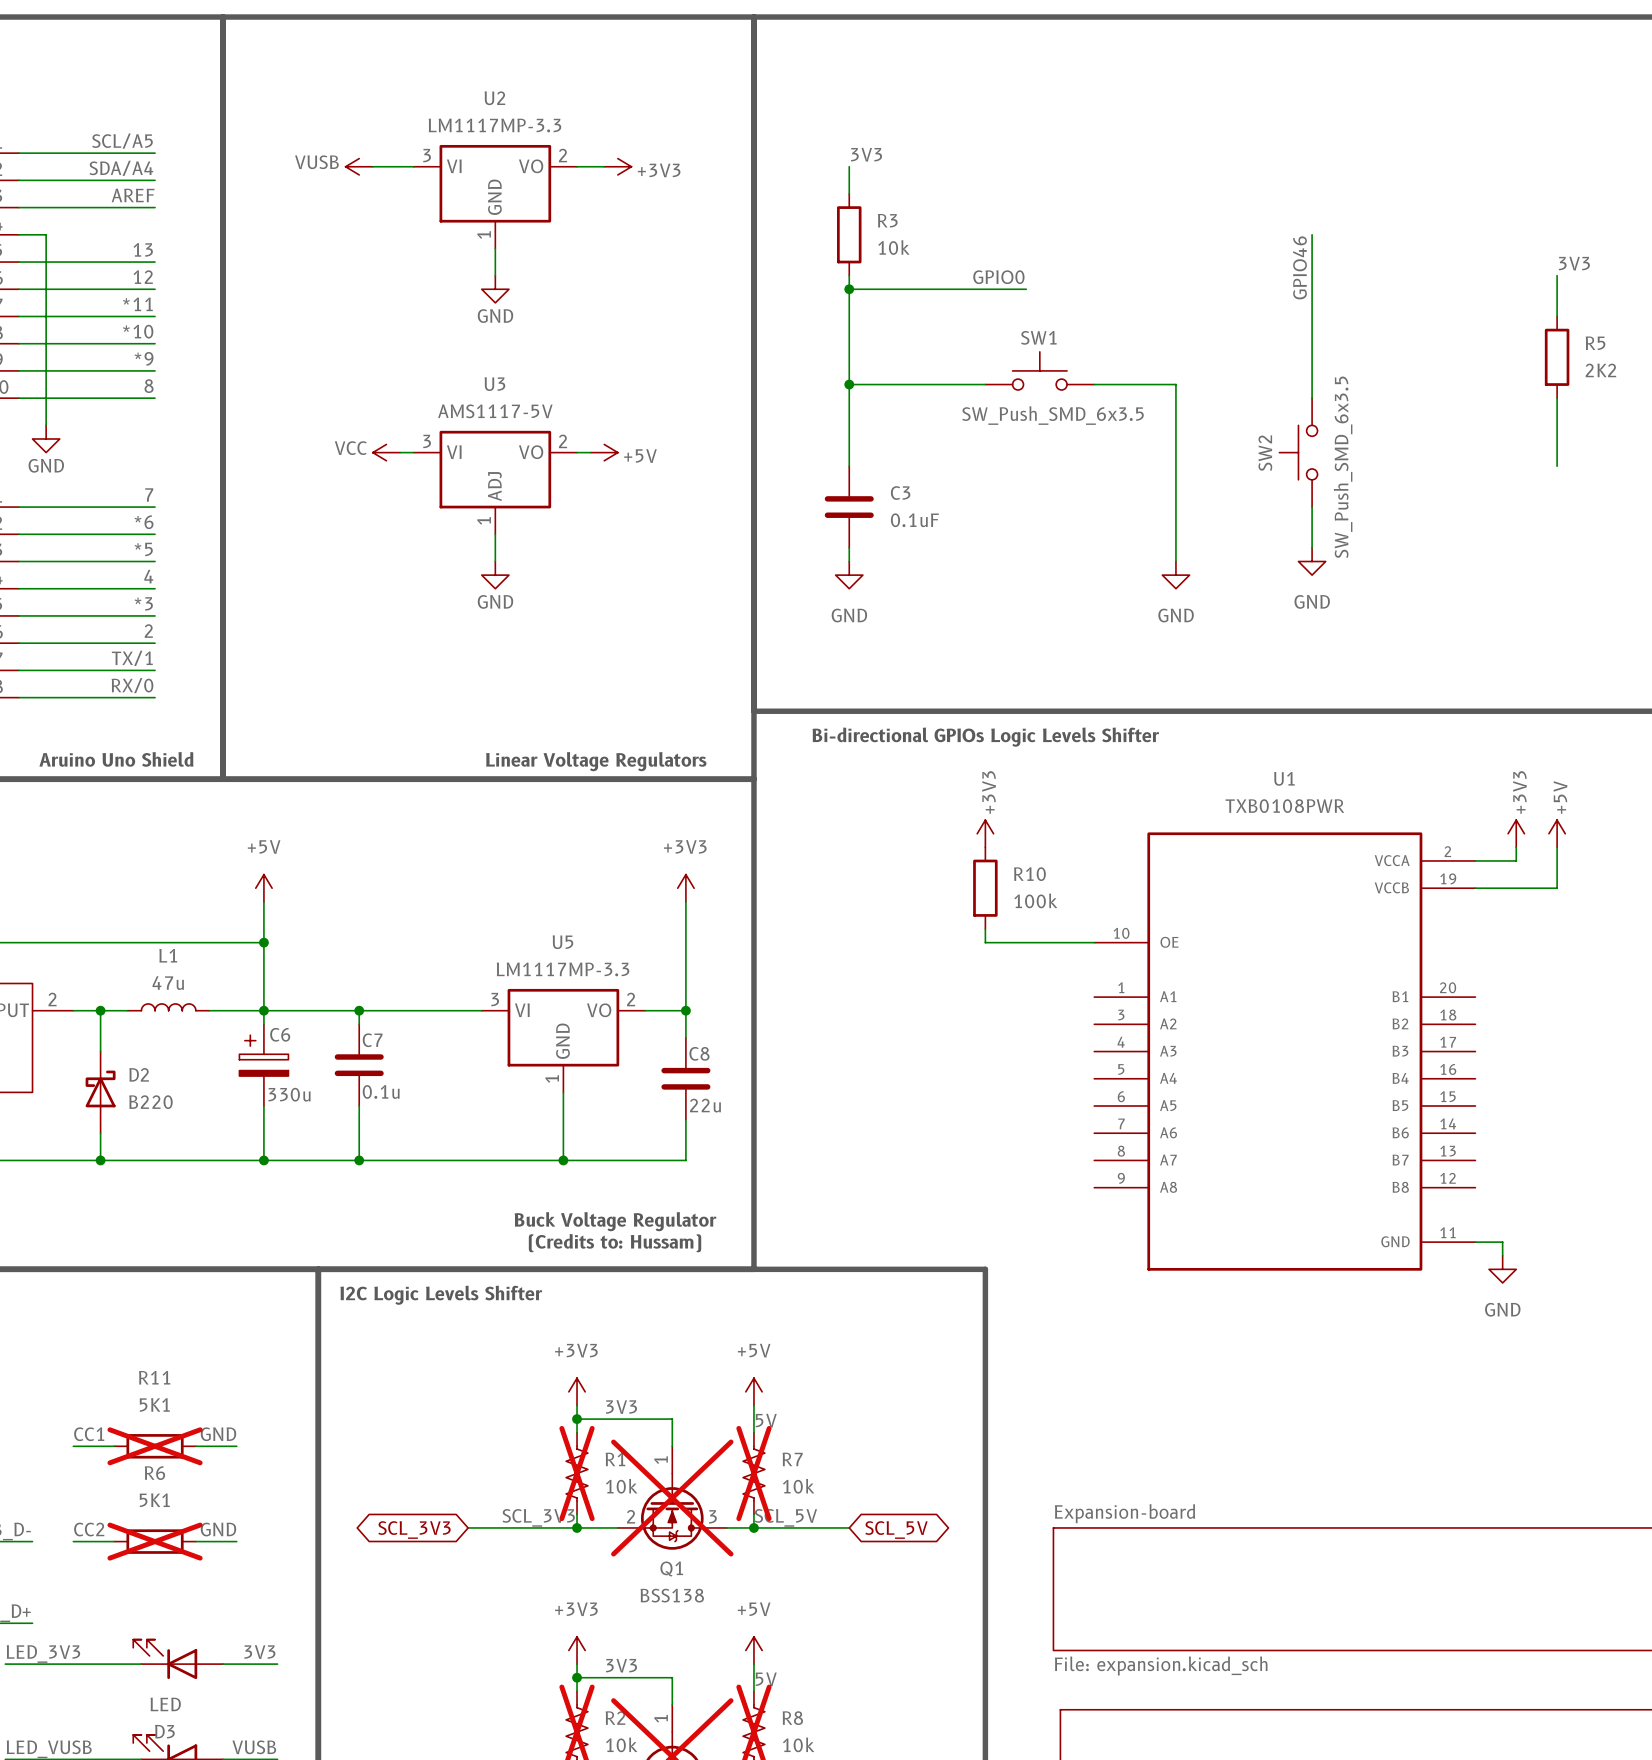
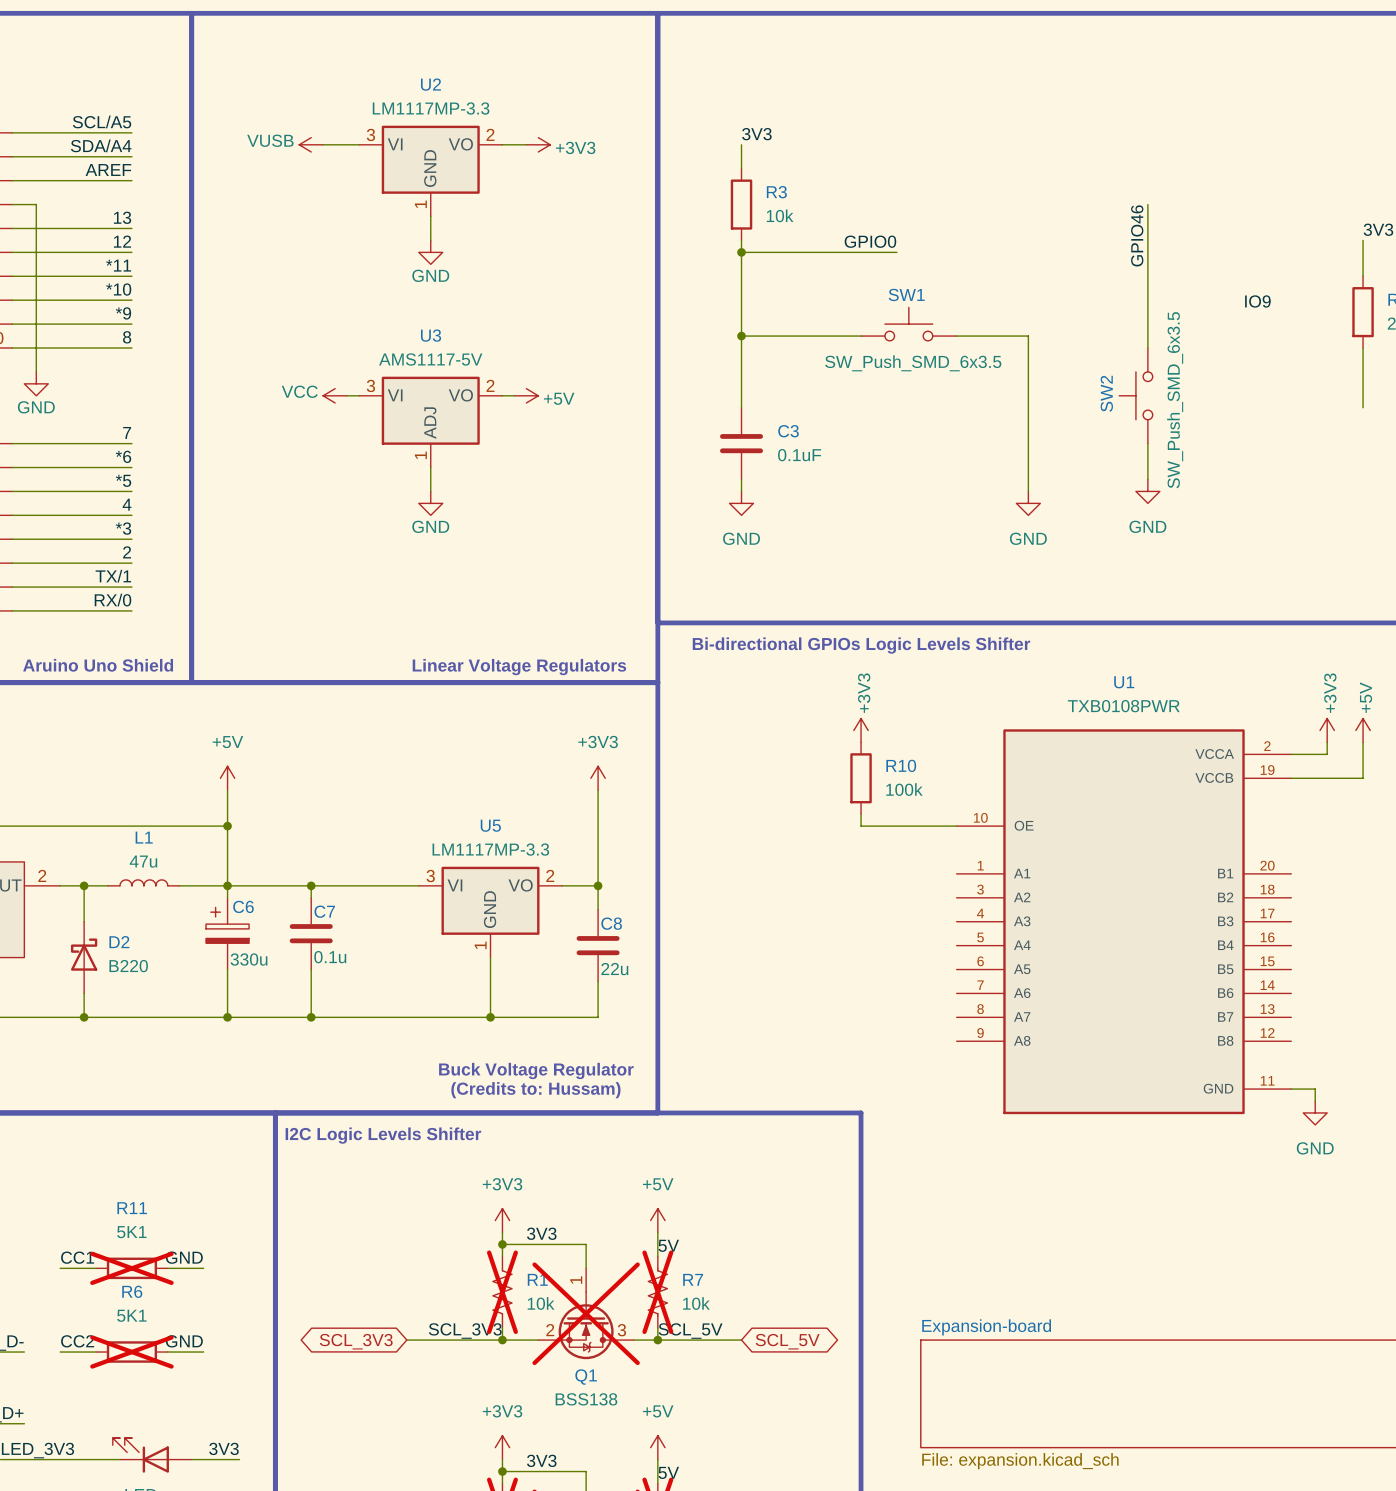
label: none -> IO9 (1257, 301)

